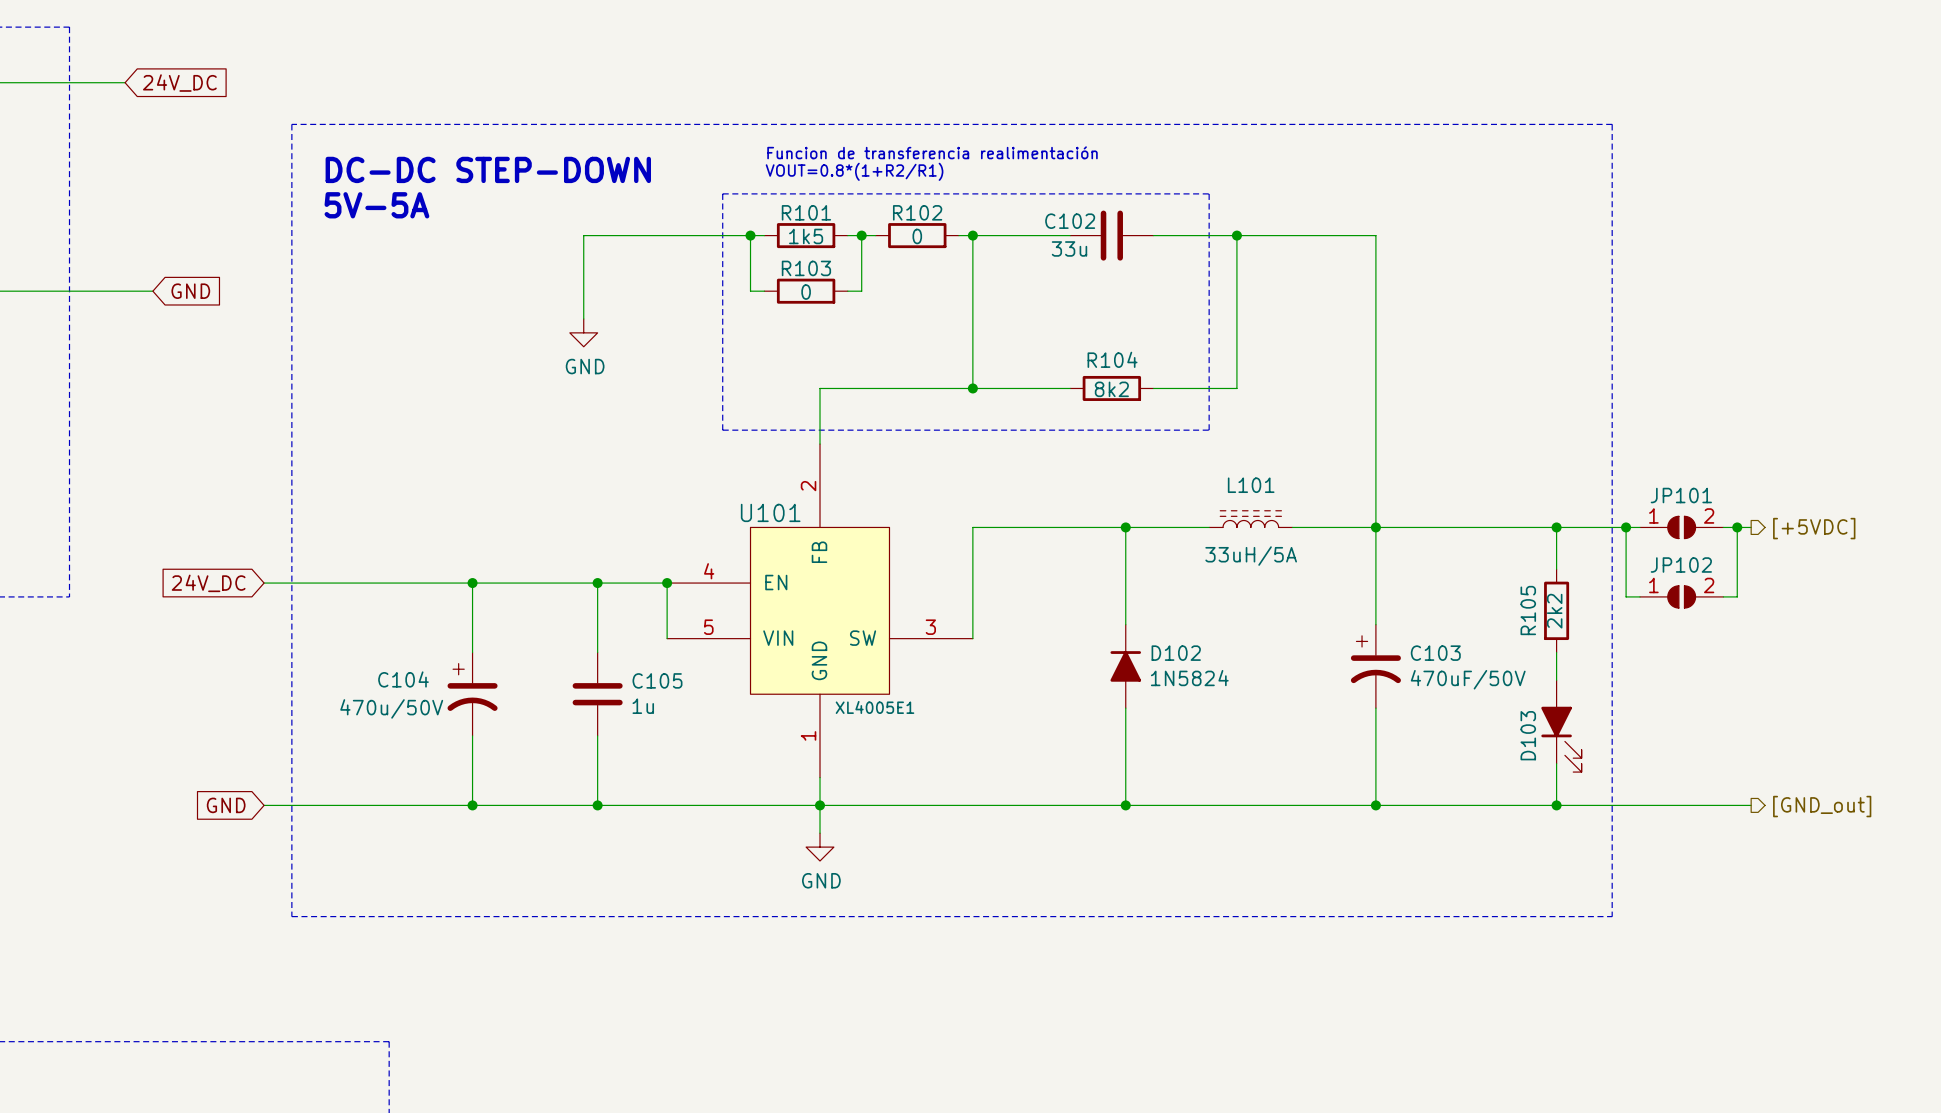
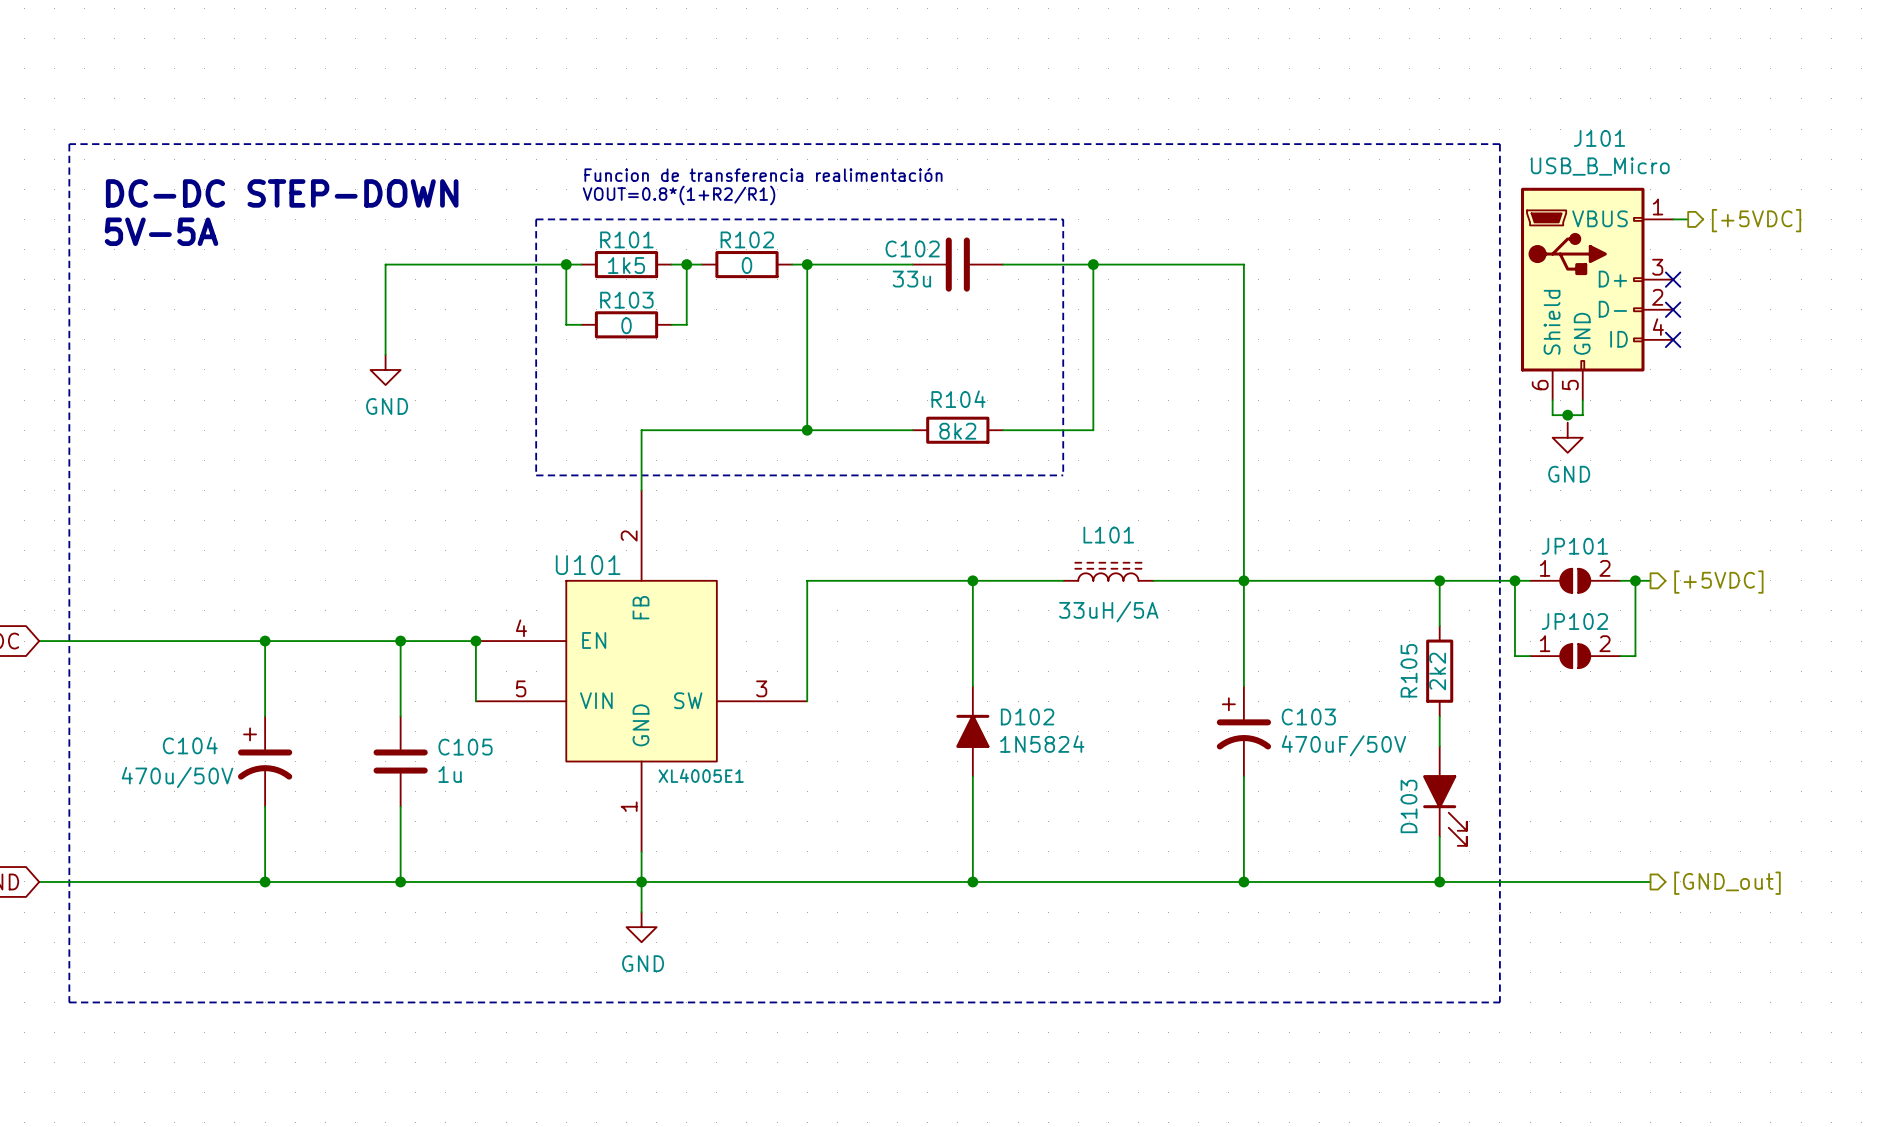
wire: none -> (1673, 219) (1688, 219)
hierarchical label: none -> [+5VDC] (1756, 220)
no-connect mark: none -> (1673, 279)
J101: none -> USB_B_Micro (1597, 293)
no-connect mark: none -> (1673, 309)
no-connect mark: none -> (1673, 339)
wire: none -> (1552, 400) (1552, 415) (1582, 415) (1582, 400)
junction: none -> (1567, 415)
power symbol: none -> GND (1567, 437)

